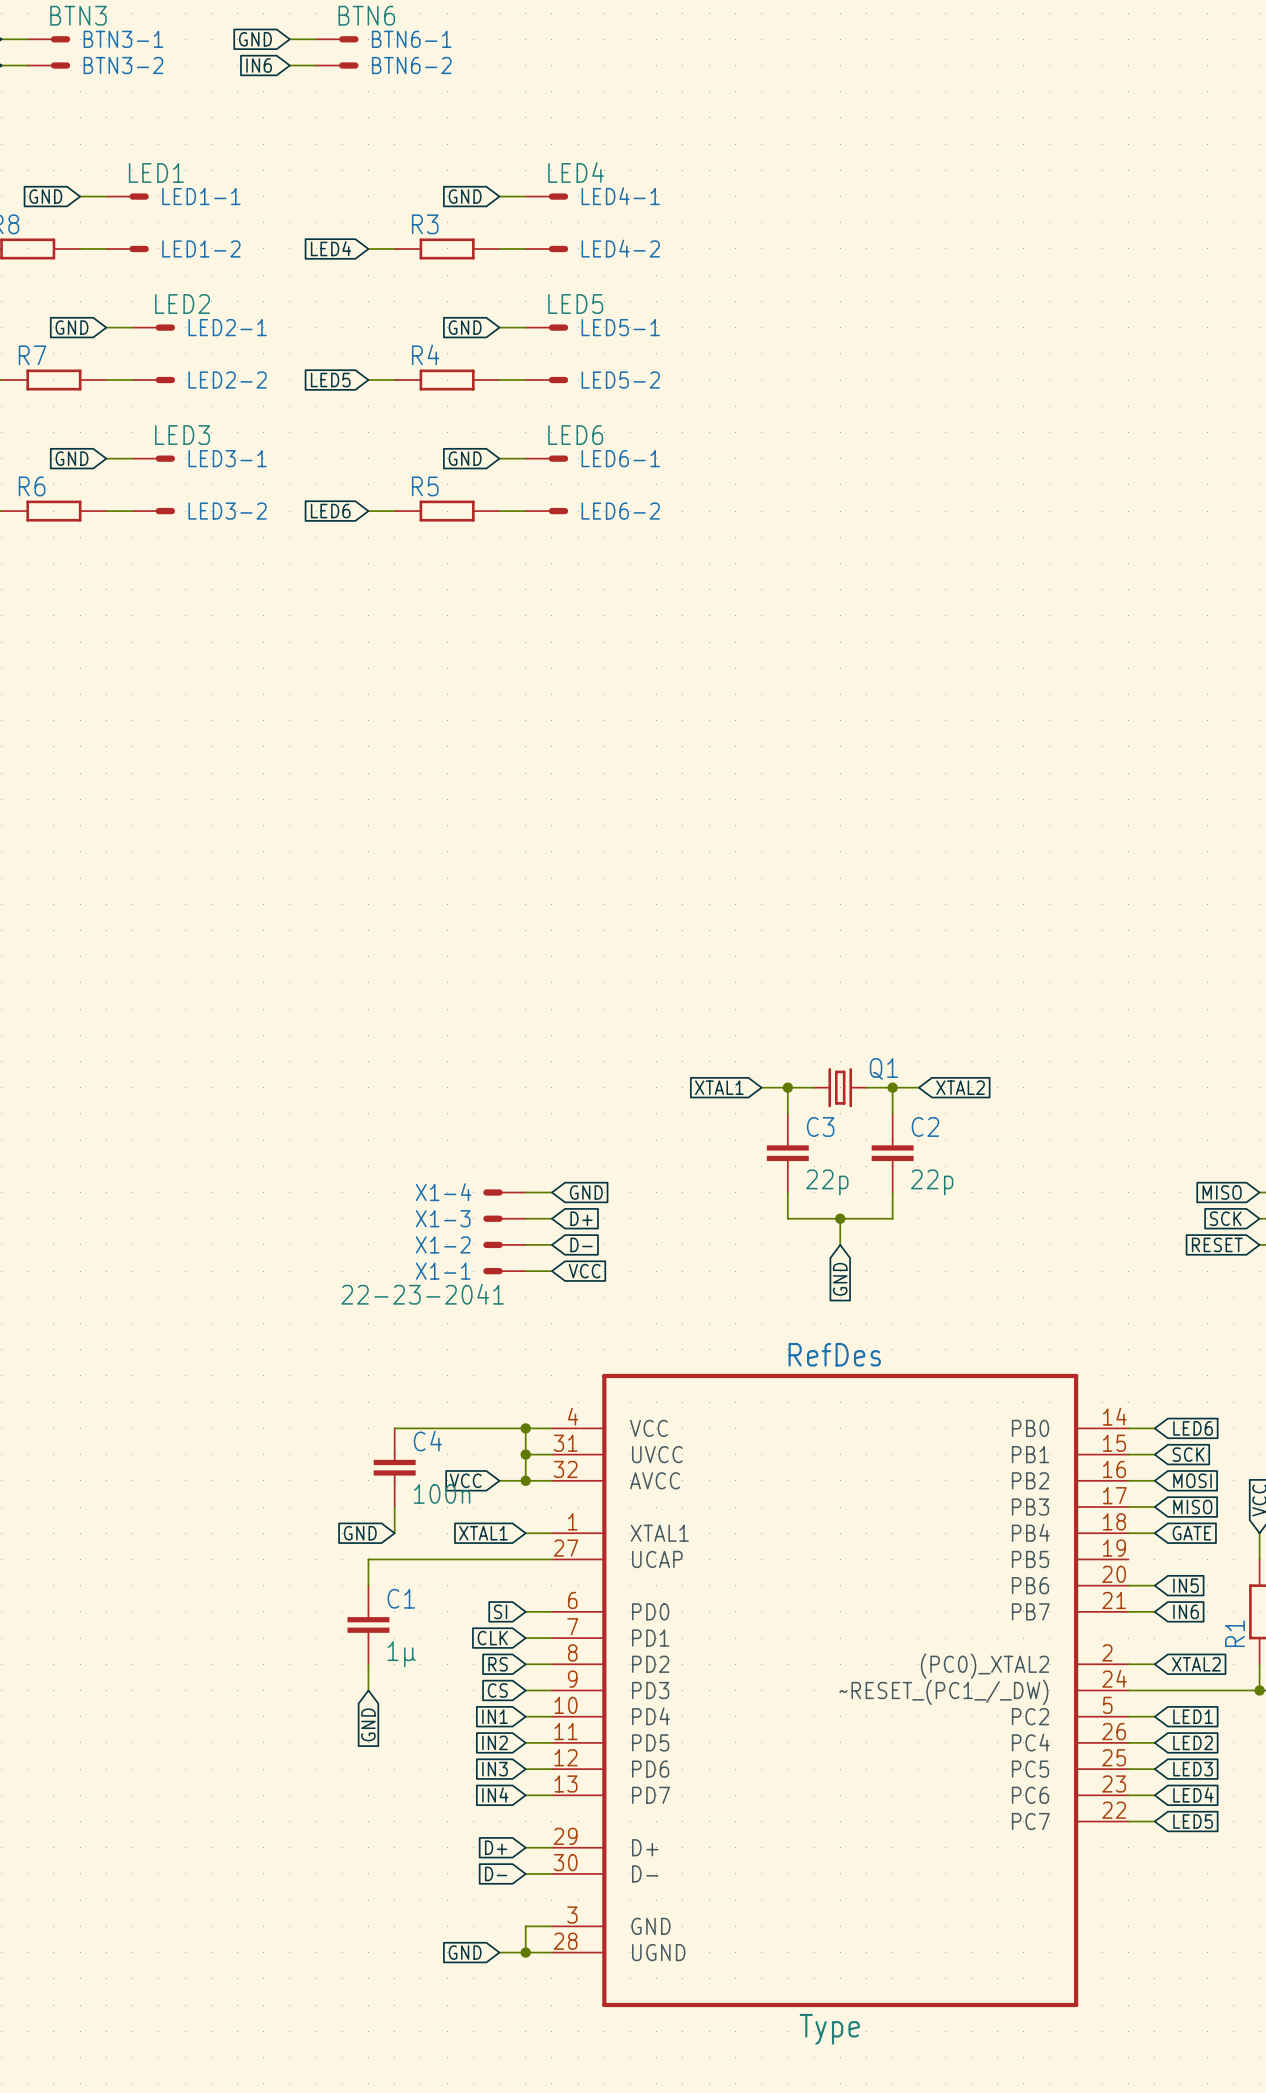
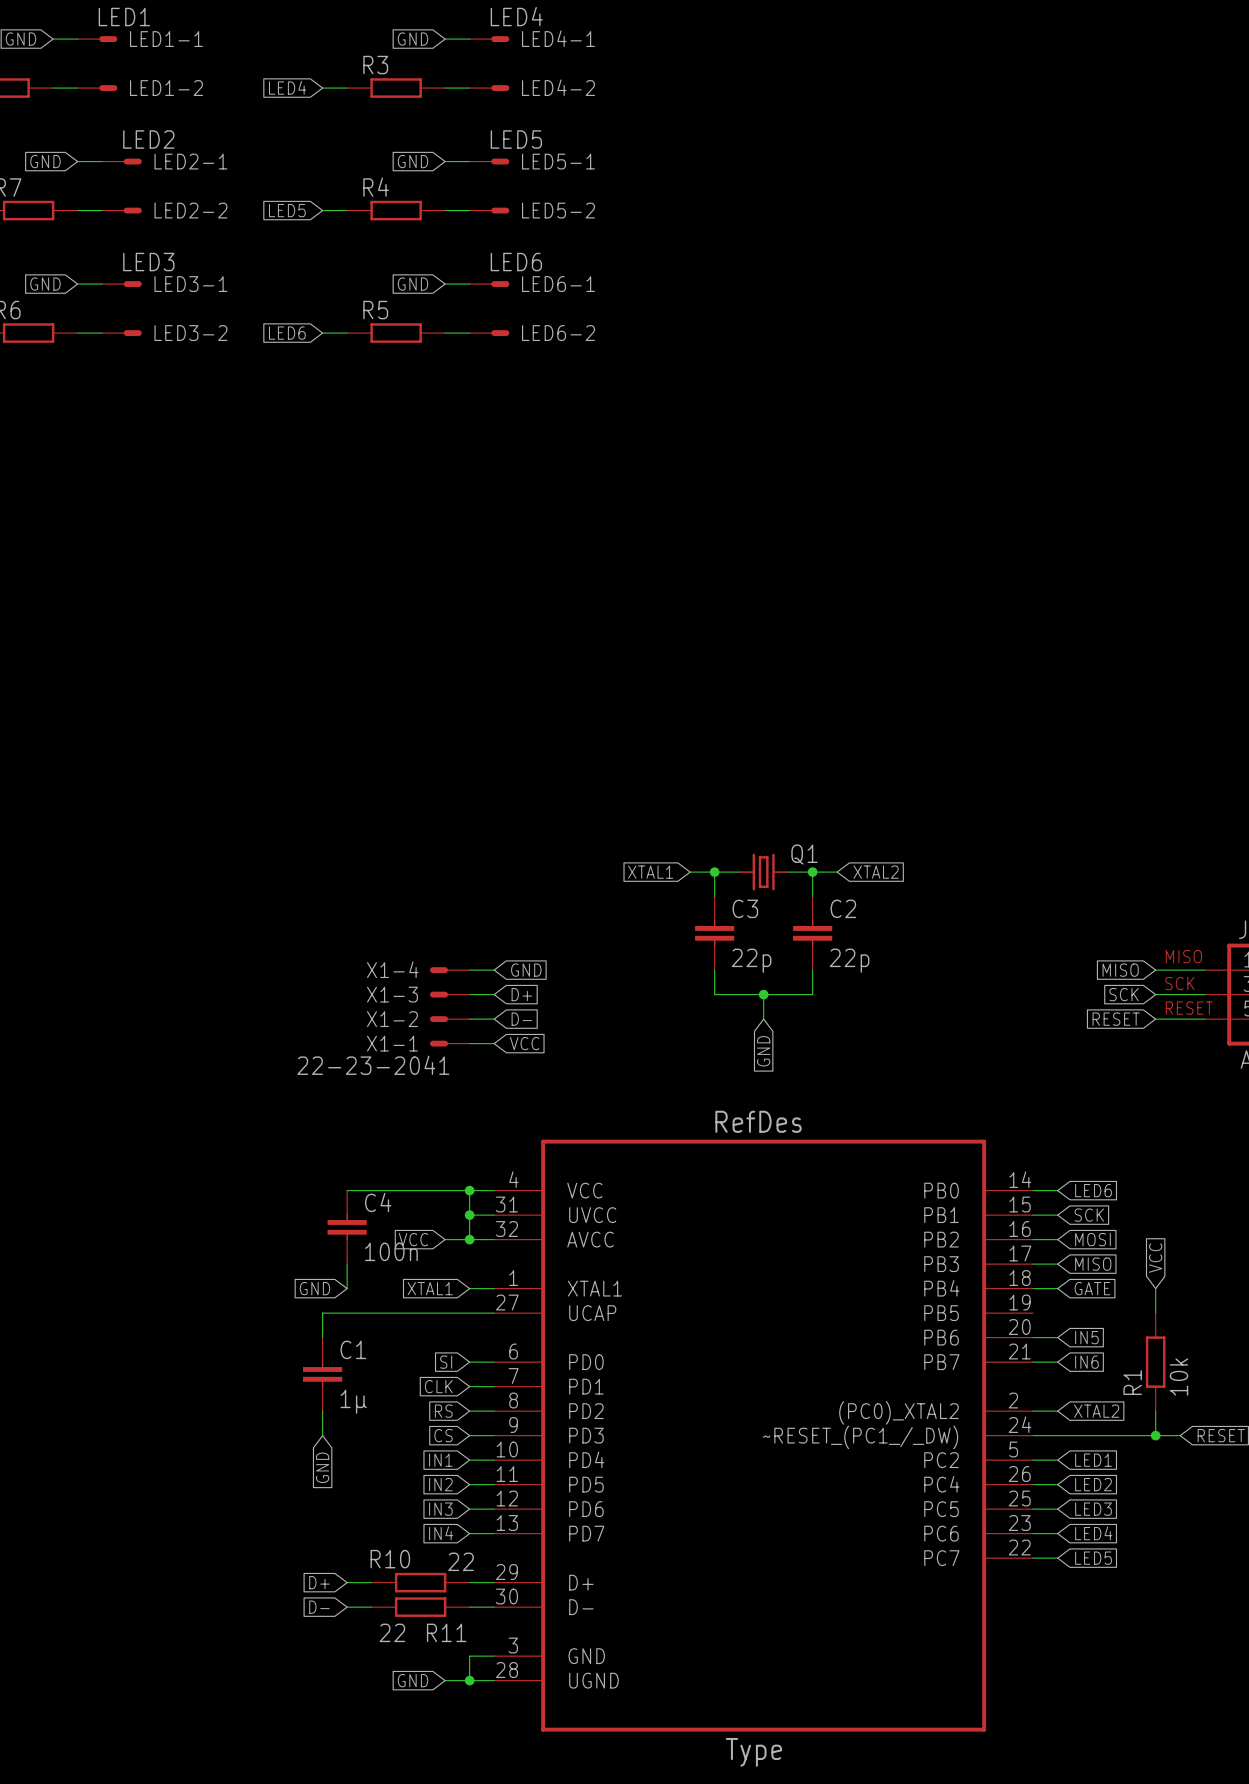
wire: none -> (347, 1582) (371, 1582)
R10: none -> 22 (420, 1582)
global label position: D+ (496, 1847) -> D+ (319, 1582)
wire: none -> (347, 1607) (371, 1607)
R11: none -> 22 (420, 1607)
global label position: D- (496, 1873) -> D- (319, 1607)

